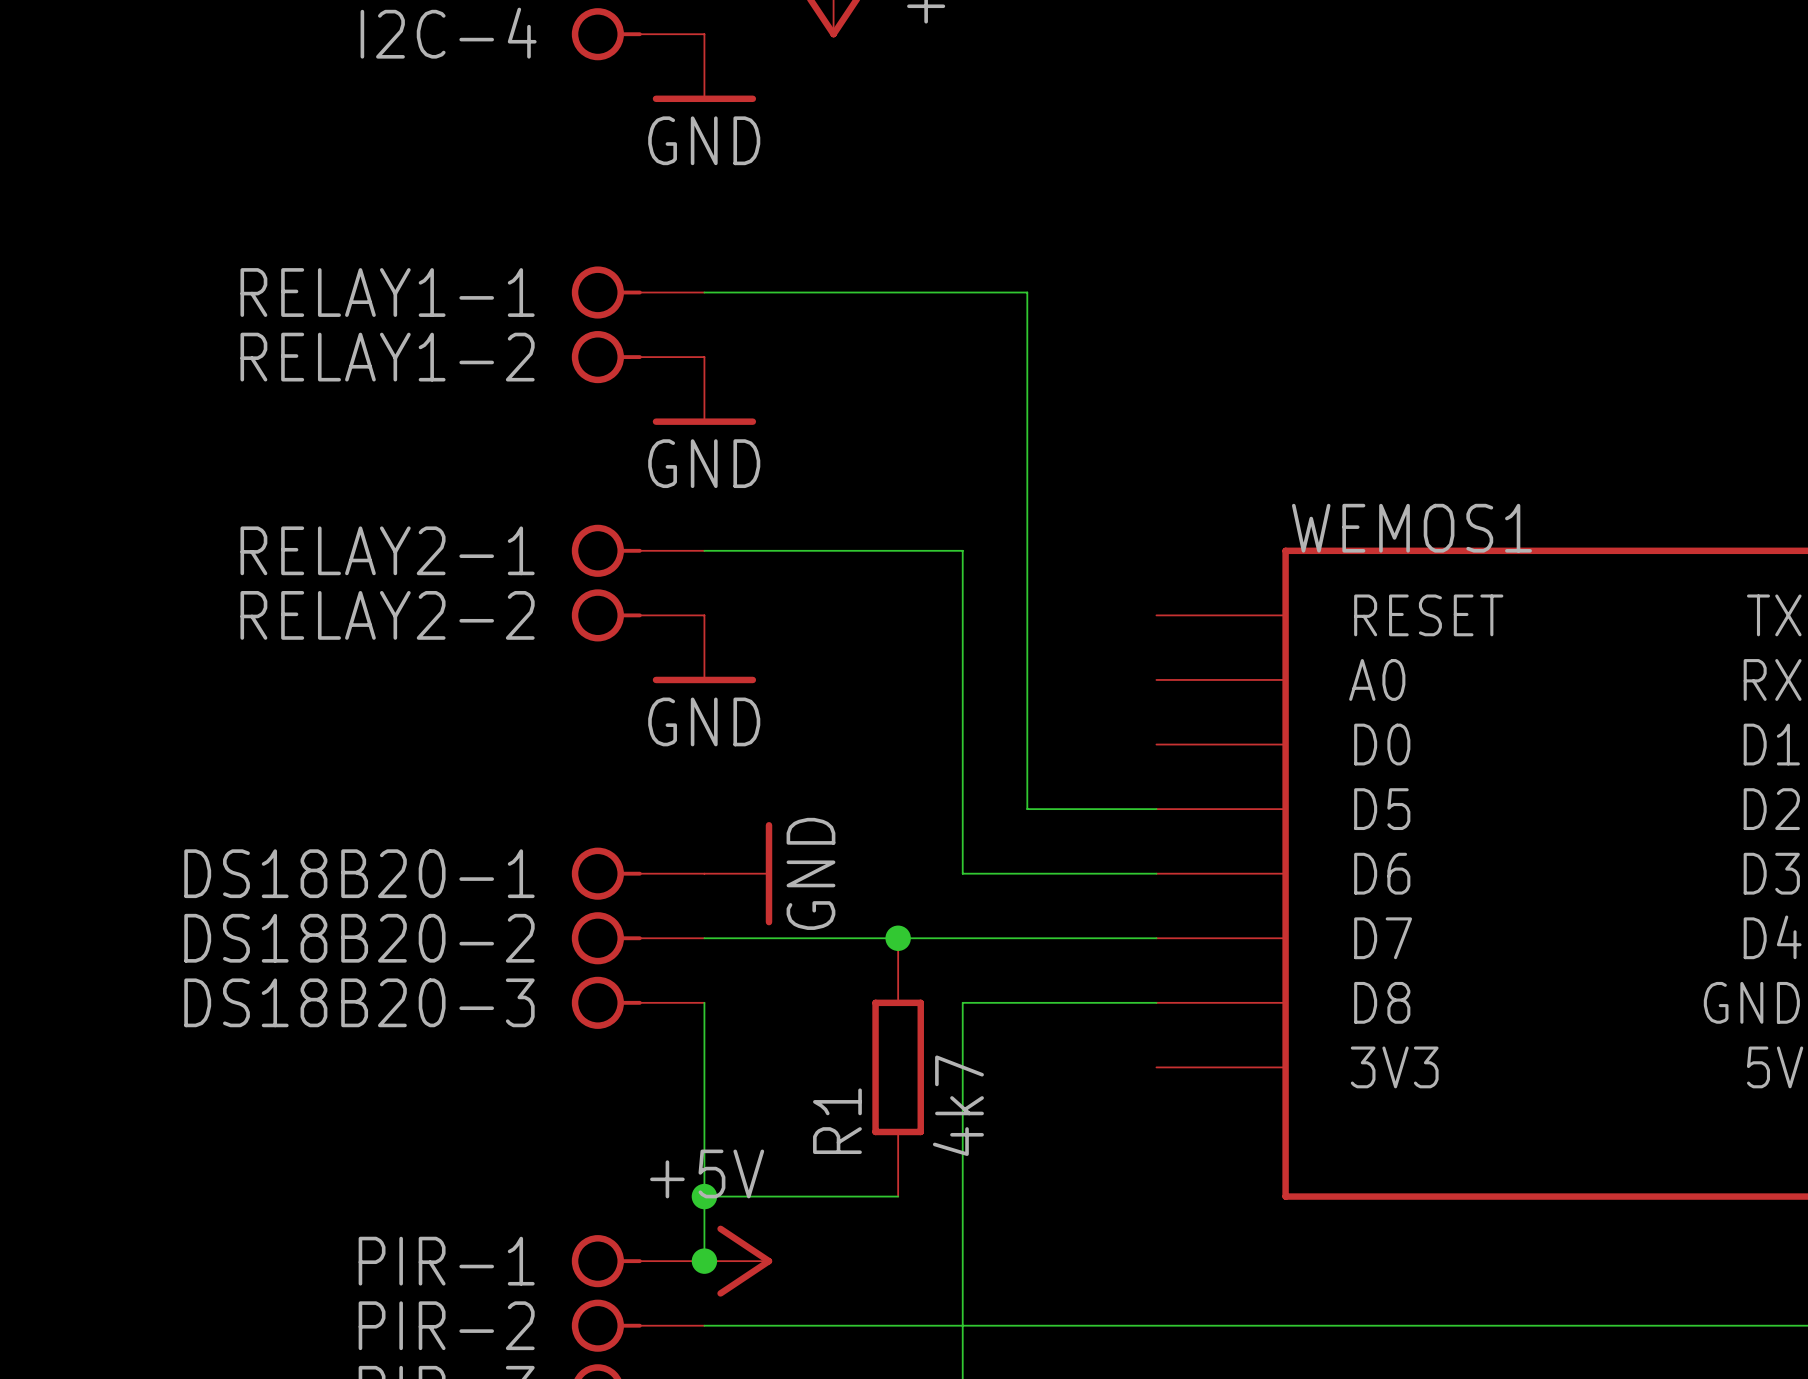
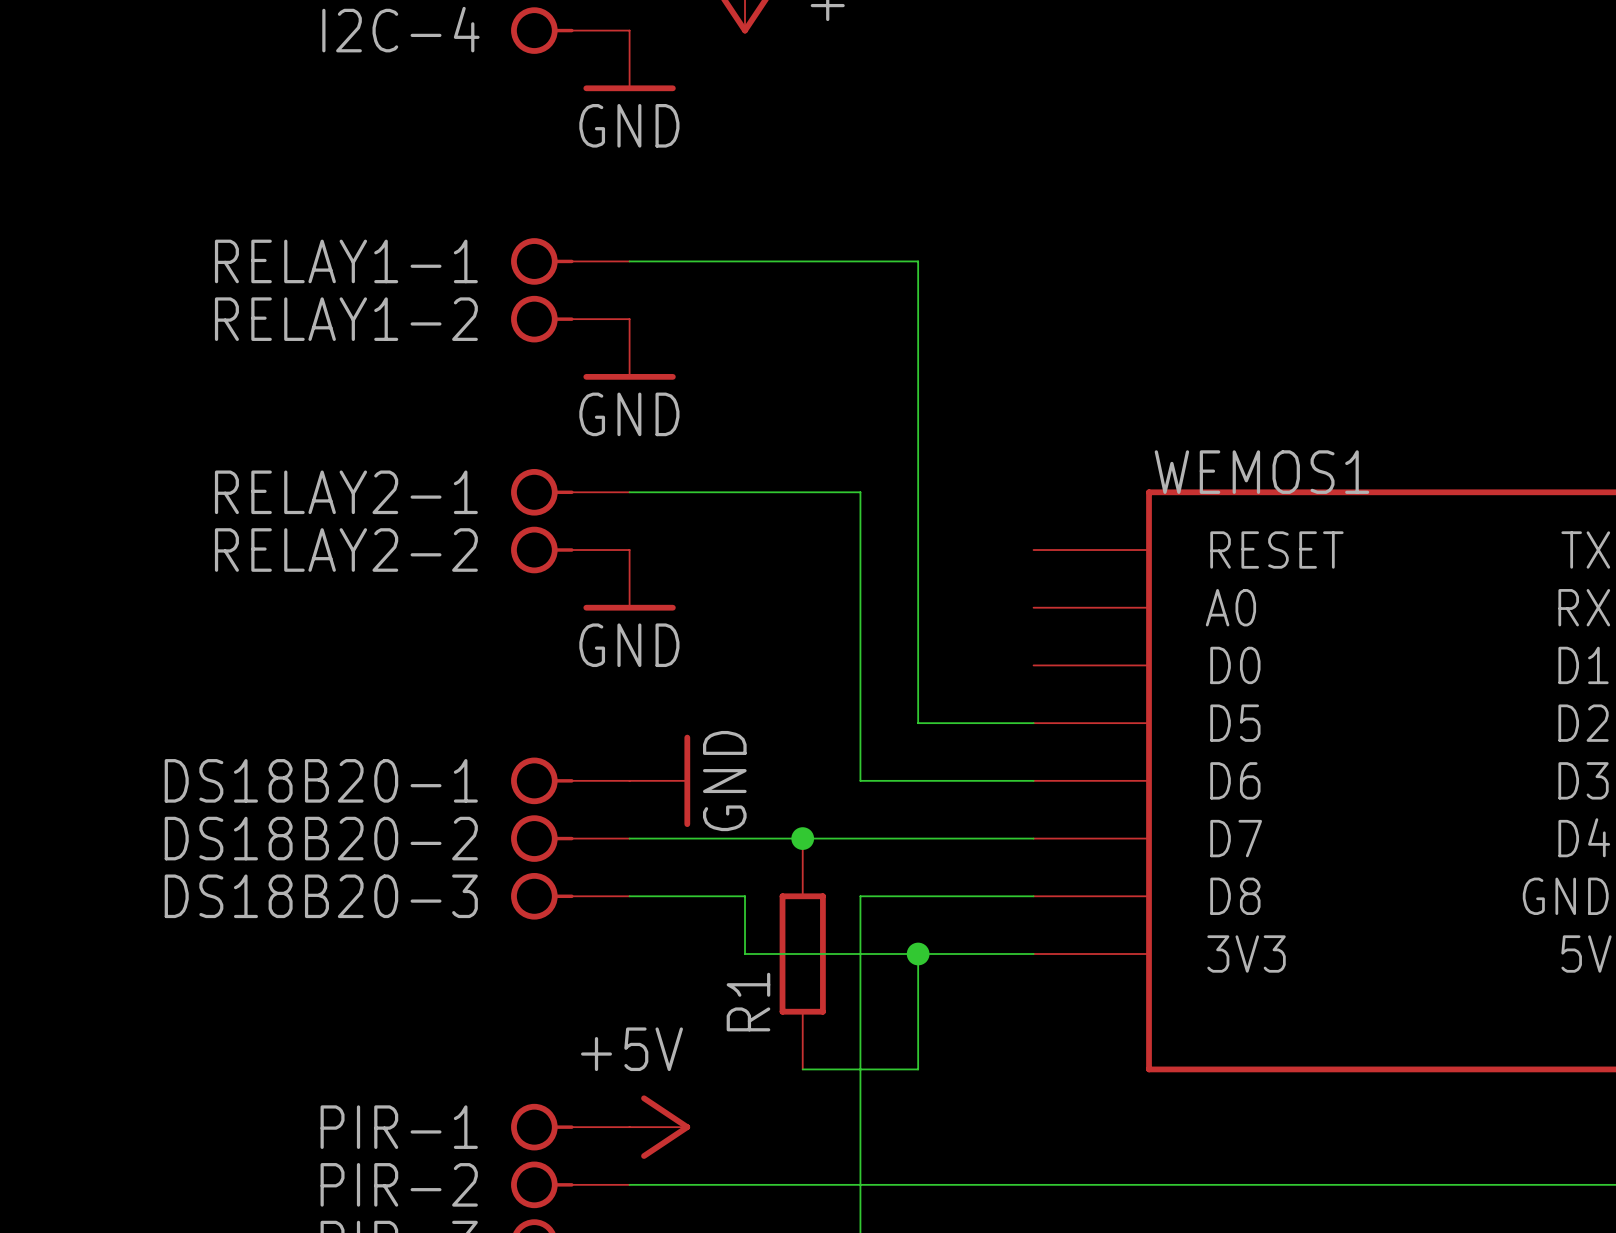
wire: (704, 1002) (704, 1261) -> (629, 896) (745, 896) (745, 954) (1033, 954)
junction: none -> (918, 954)
R1 value: 4k7 (958, 1105) -> none
wire: (704, 1196) (898, 1196) -> (918, 954) (918, 1069) (802, 1069)
junction: (704, 1196) -> none
junction: (704, 1261) -> none

